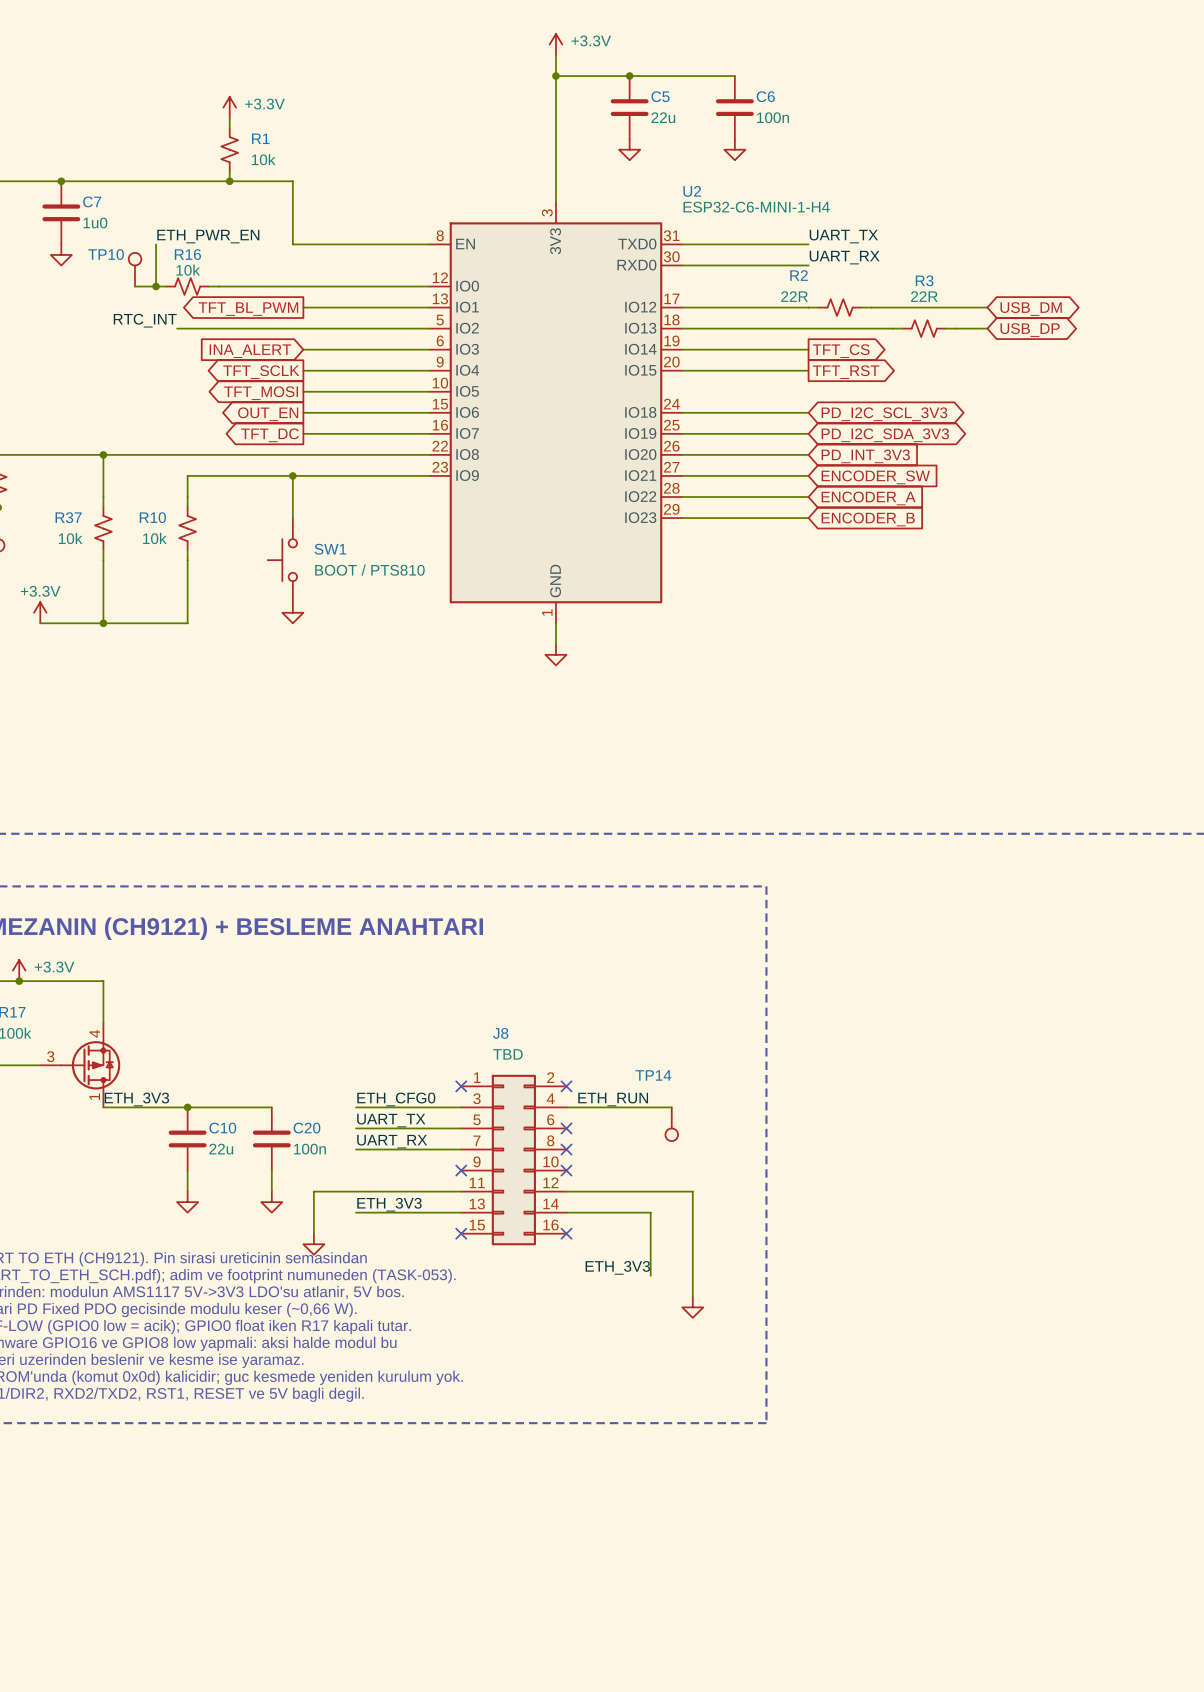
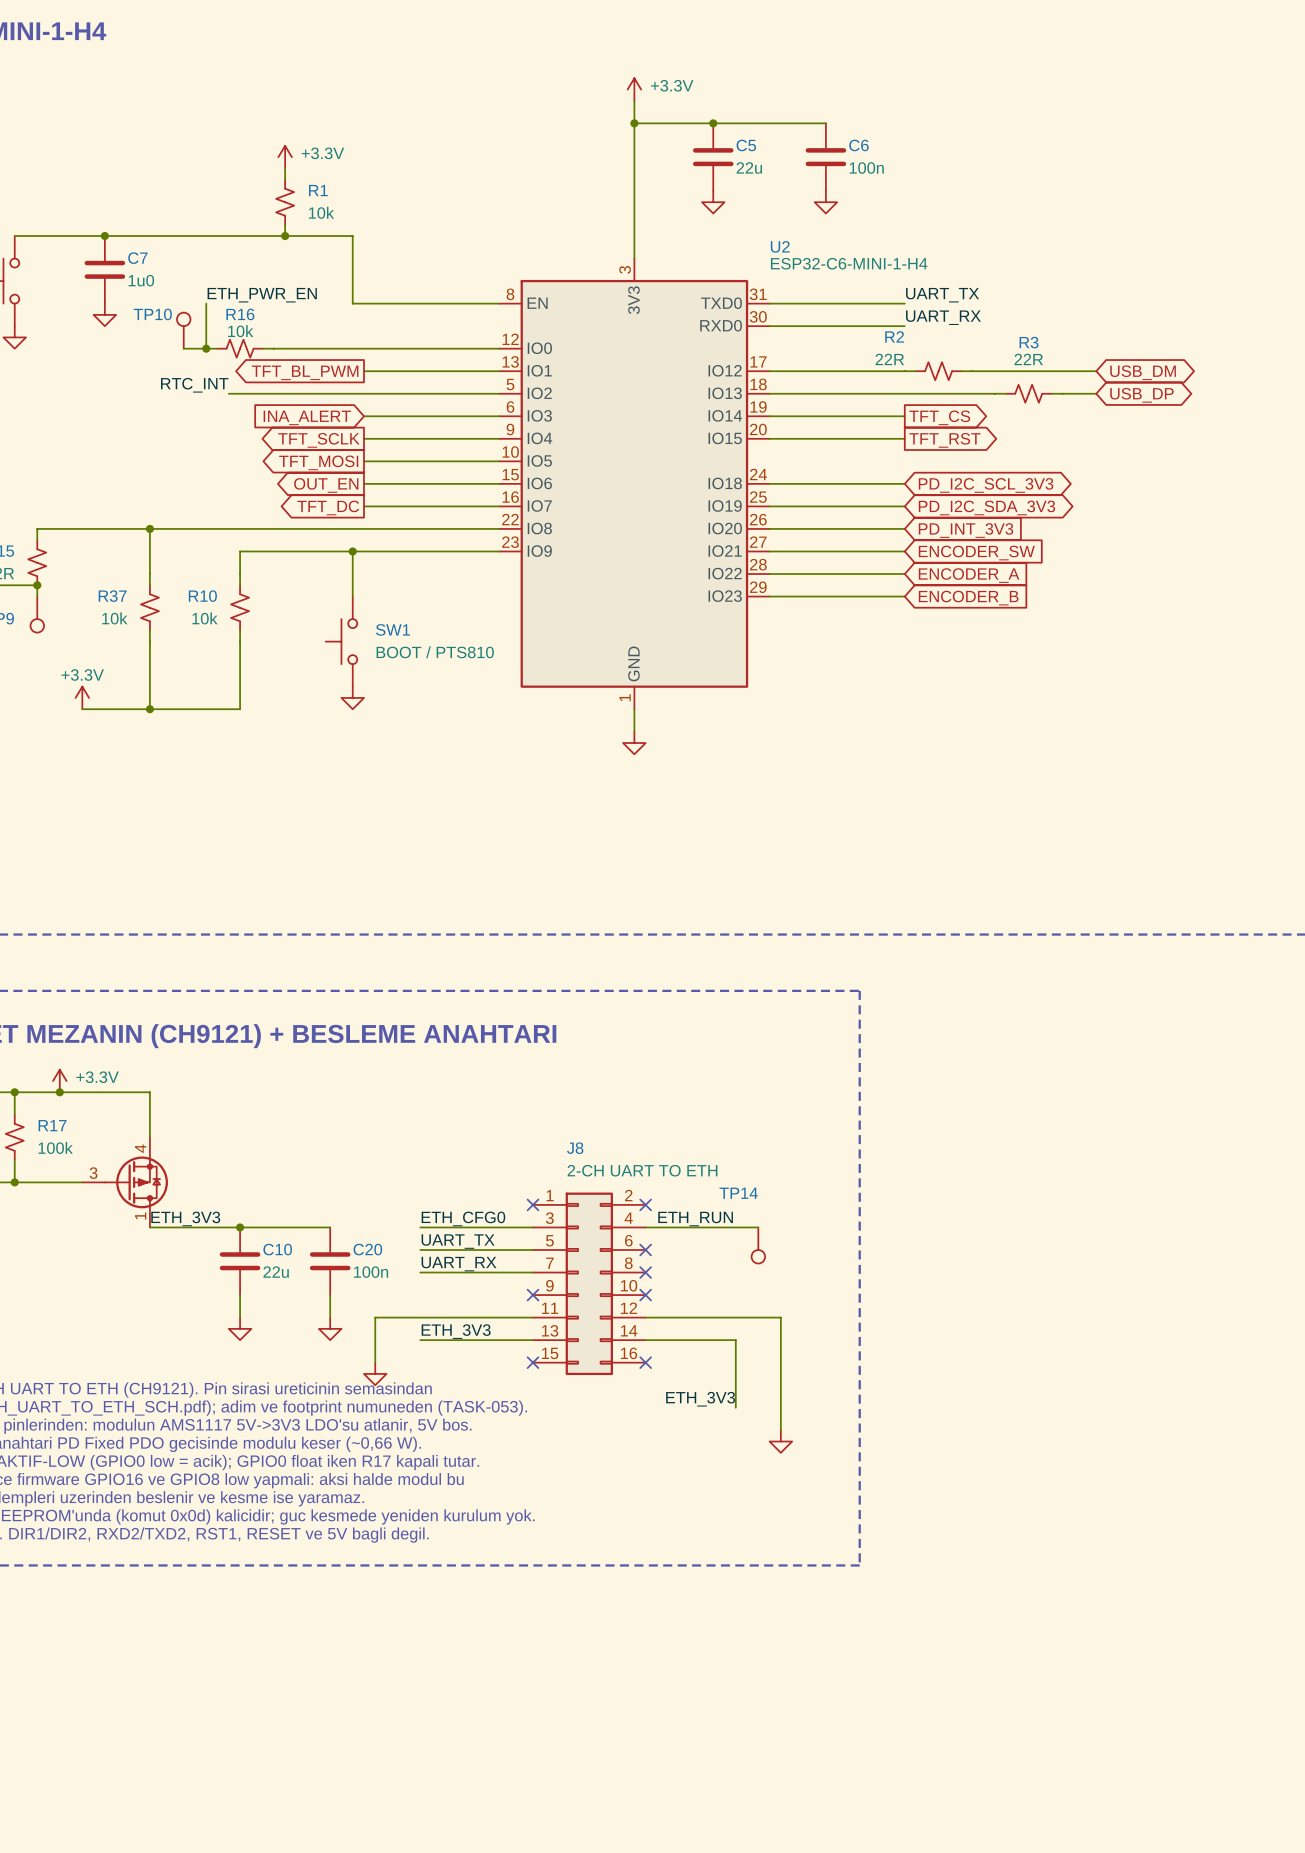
J8 value: TBD (507, 1054) -> 2-CH UART TO ETH (642, 1170)

